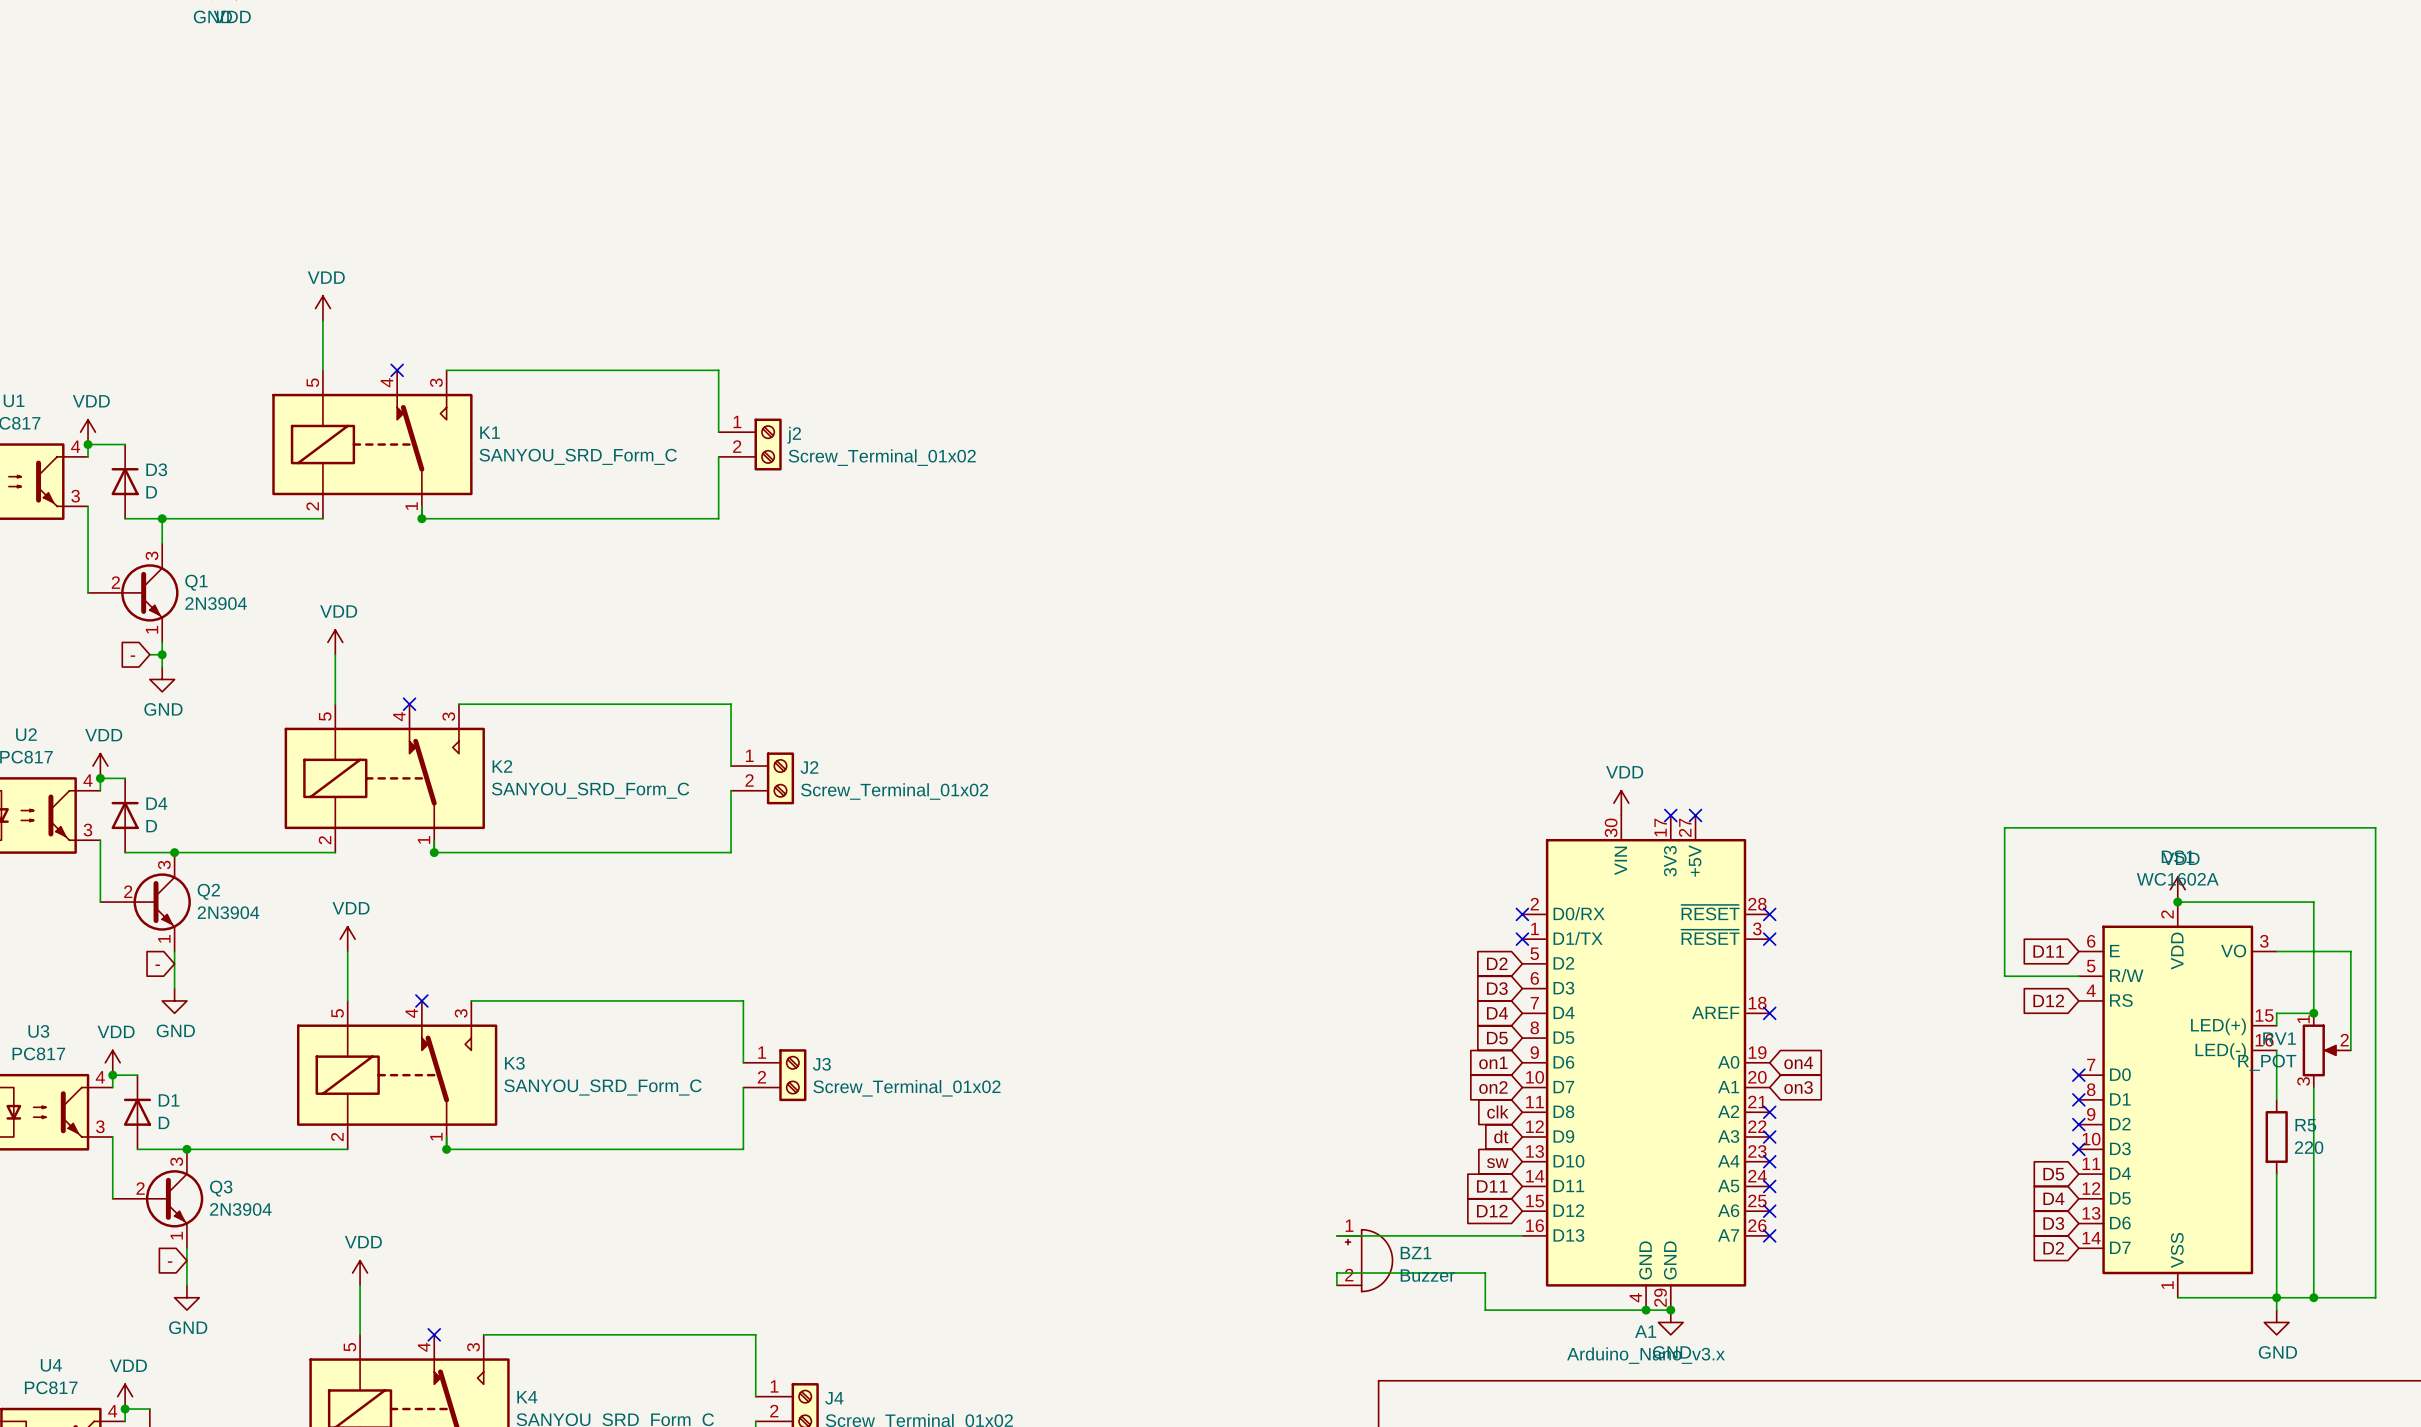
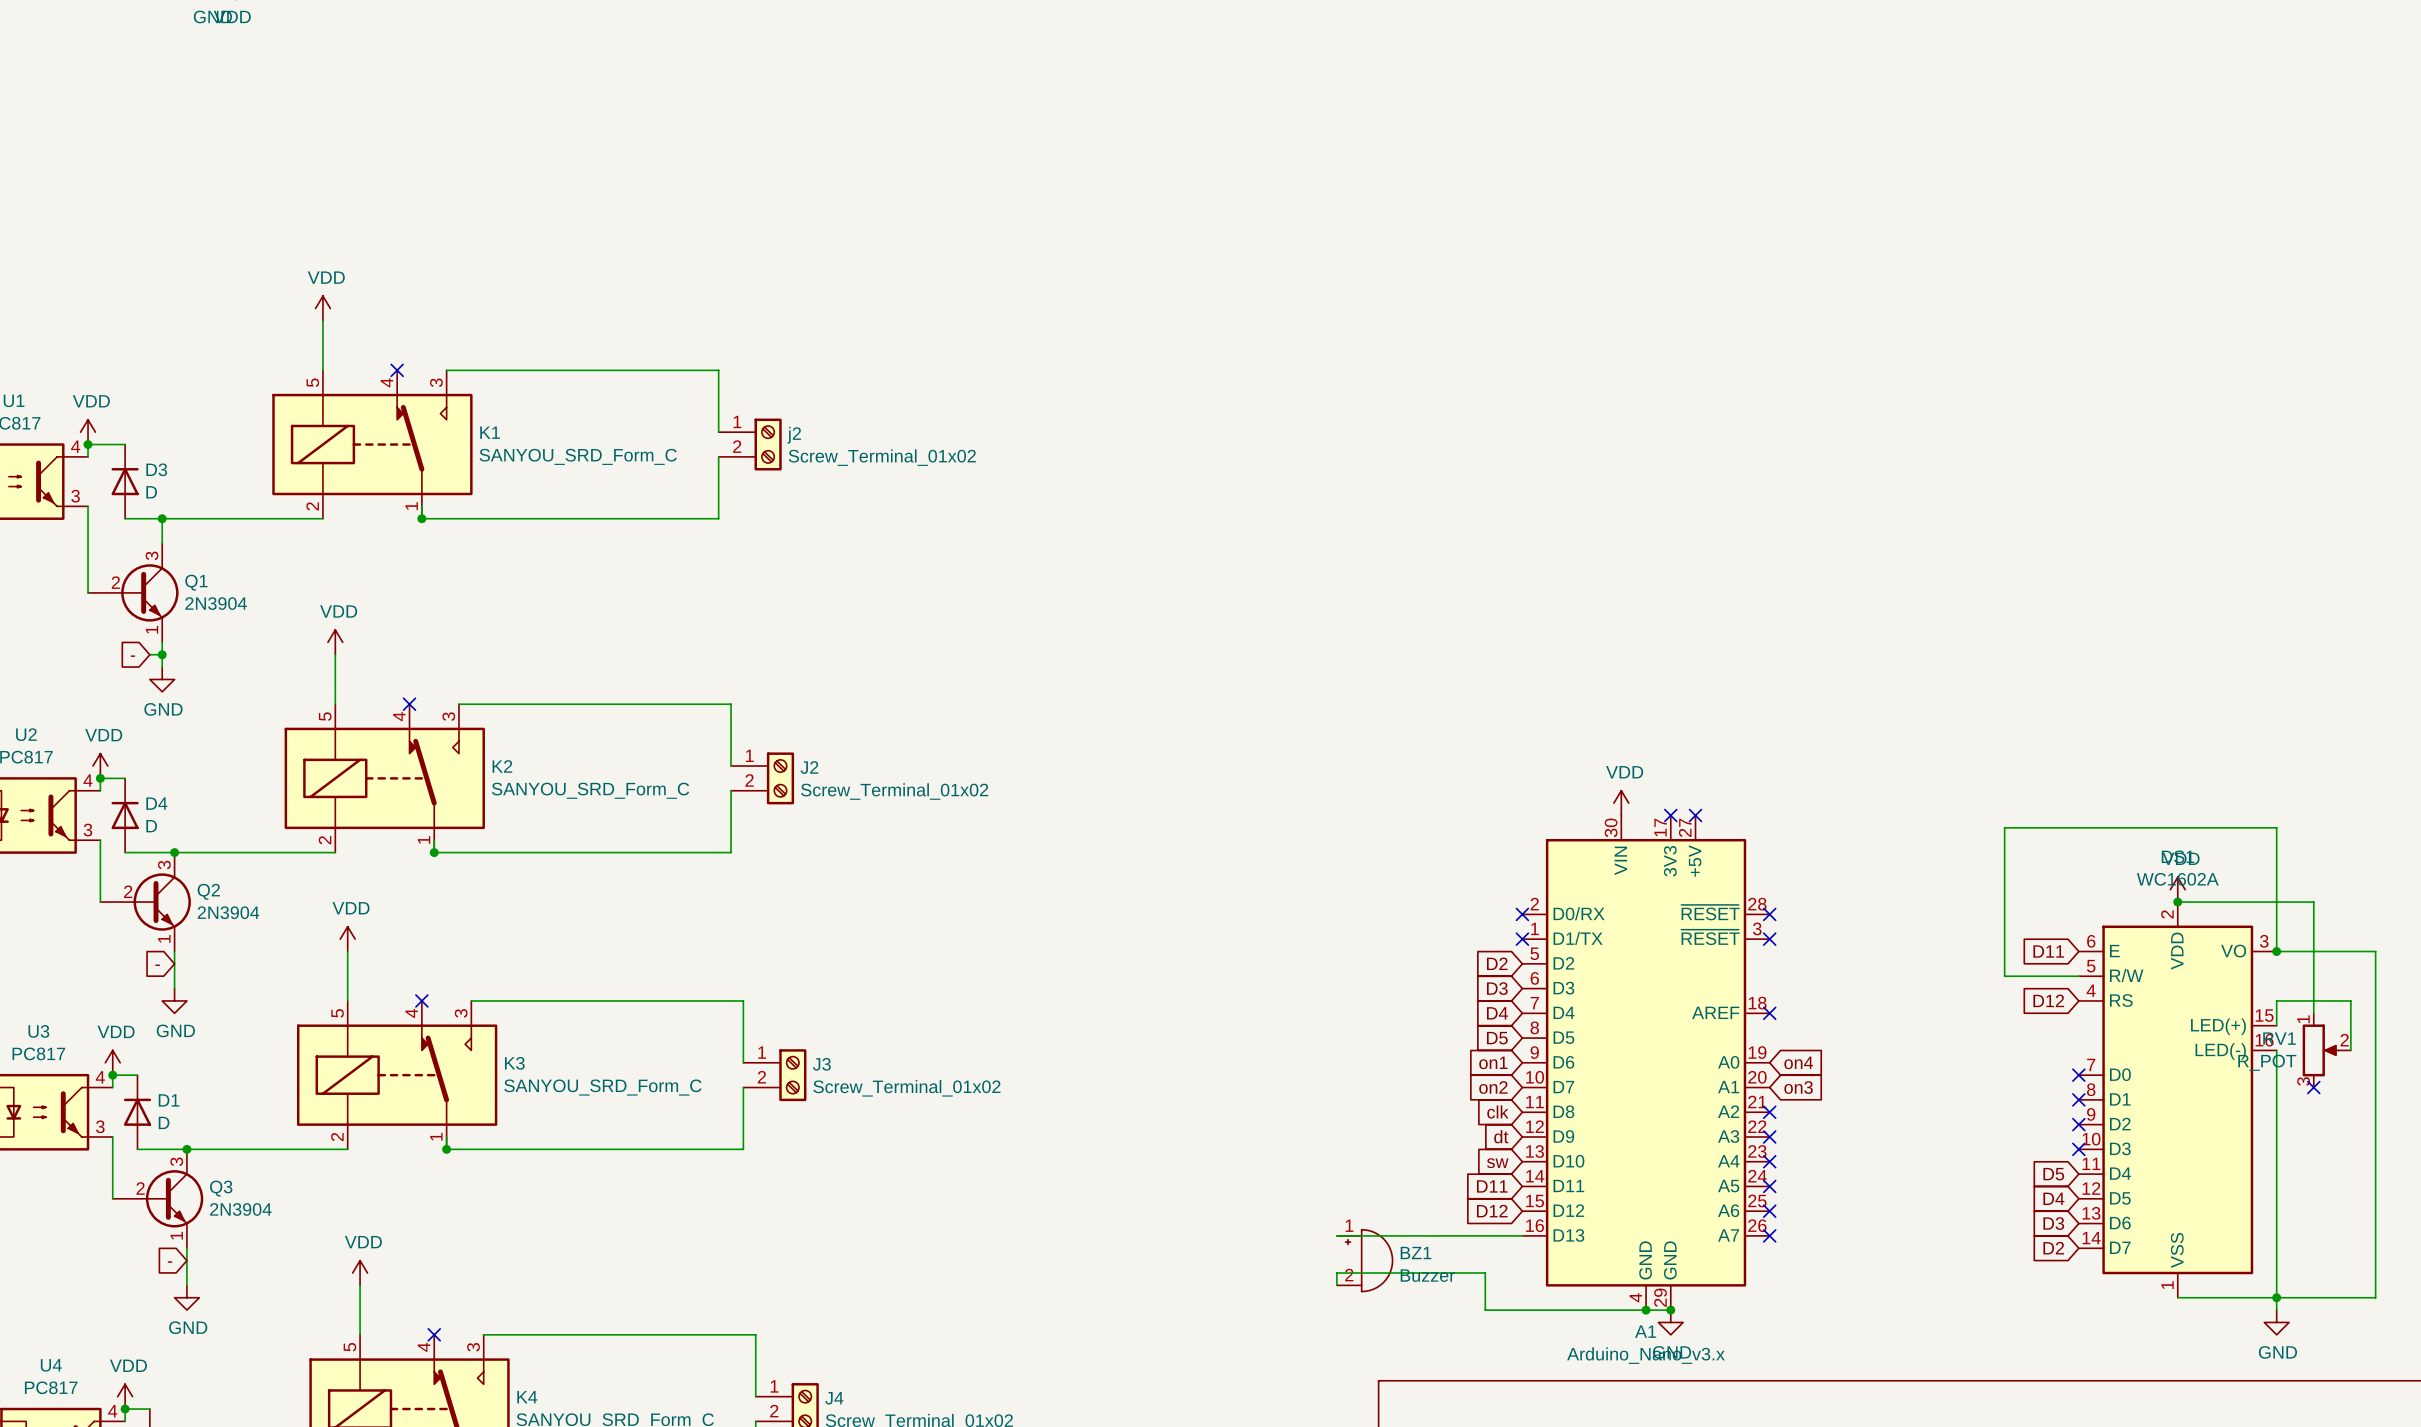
wire: (2276, 827) (2375, 827) (2375, 951) -> (2276, 827) (2276, 951)
junction: none -> (2276, 951)
wire: (2350, 951) (2350, 1000) -> (2350, 951) (2375, 951)
wire: (2276, 1013) (2313, 1013) -> (2276, 1013) (2276, 1000) (2350, 1000)
junction: (2313, 1013) -> none
wire: (2313, 1087) (2313, 1297) -> none
no-connect mark: none -> (2313, 1087)
wire: none -> (2276, 1099) (2276, 1174)
R5: 220 (2276, 1136) -> none
junction: (2313, 1297) -> none

